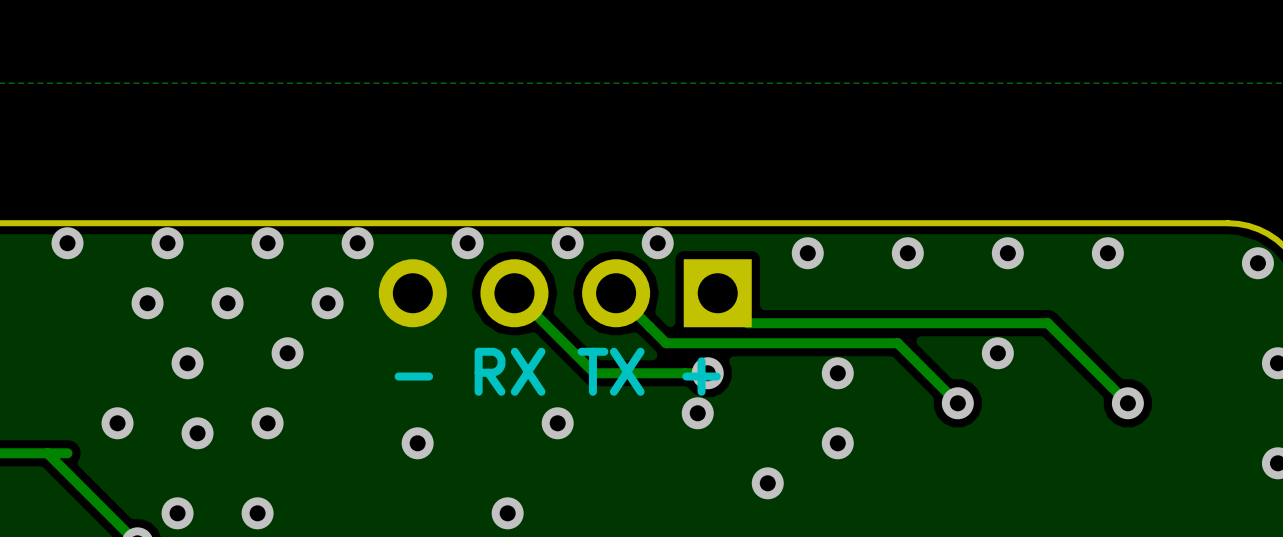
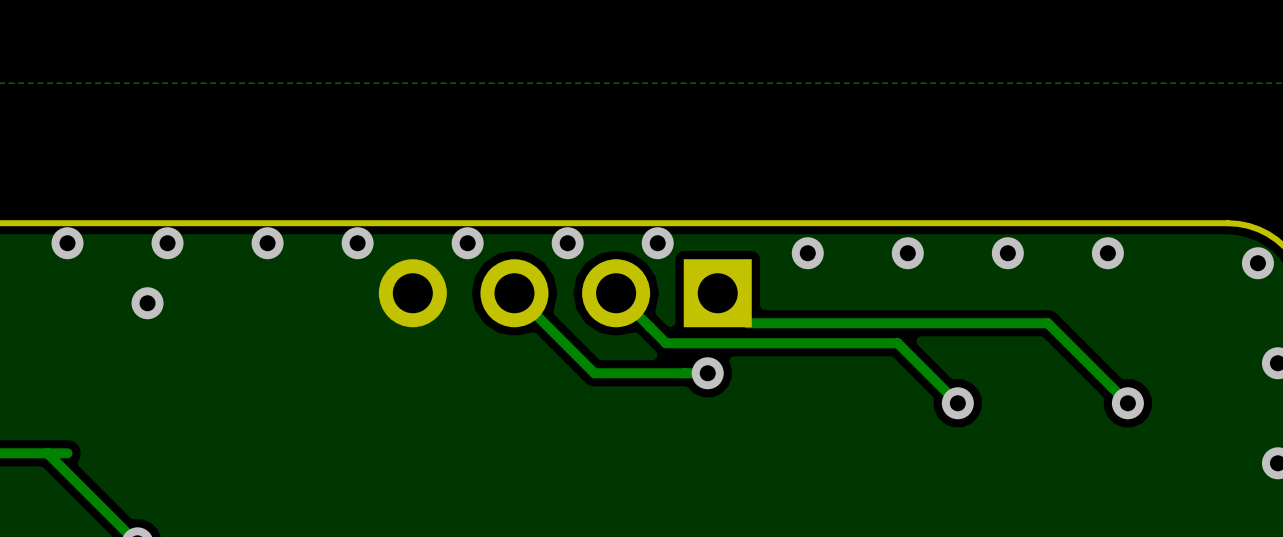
via: (227, 303) -> none
via: (327, 303) -> none
via: (287, 353) -> none
via: (997, 353) -> none
via: (187, 363) -> none
text: - RX TX + (557, 371) -> none
via: (837, 373) -> none
via: (697, 413) -> none
via: (117, 423) -> none
via: (267, 423) -> none
via: (557, 423) -> none
via: (197, 433) -> none
via: (417, 443) -> none
via: (837, 443) -> none
via: (767, 483) -> none
via: (177, 513) -> none
via: (257, 513) -> none
via: (507, 513) -> none

